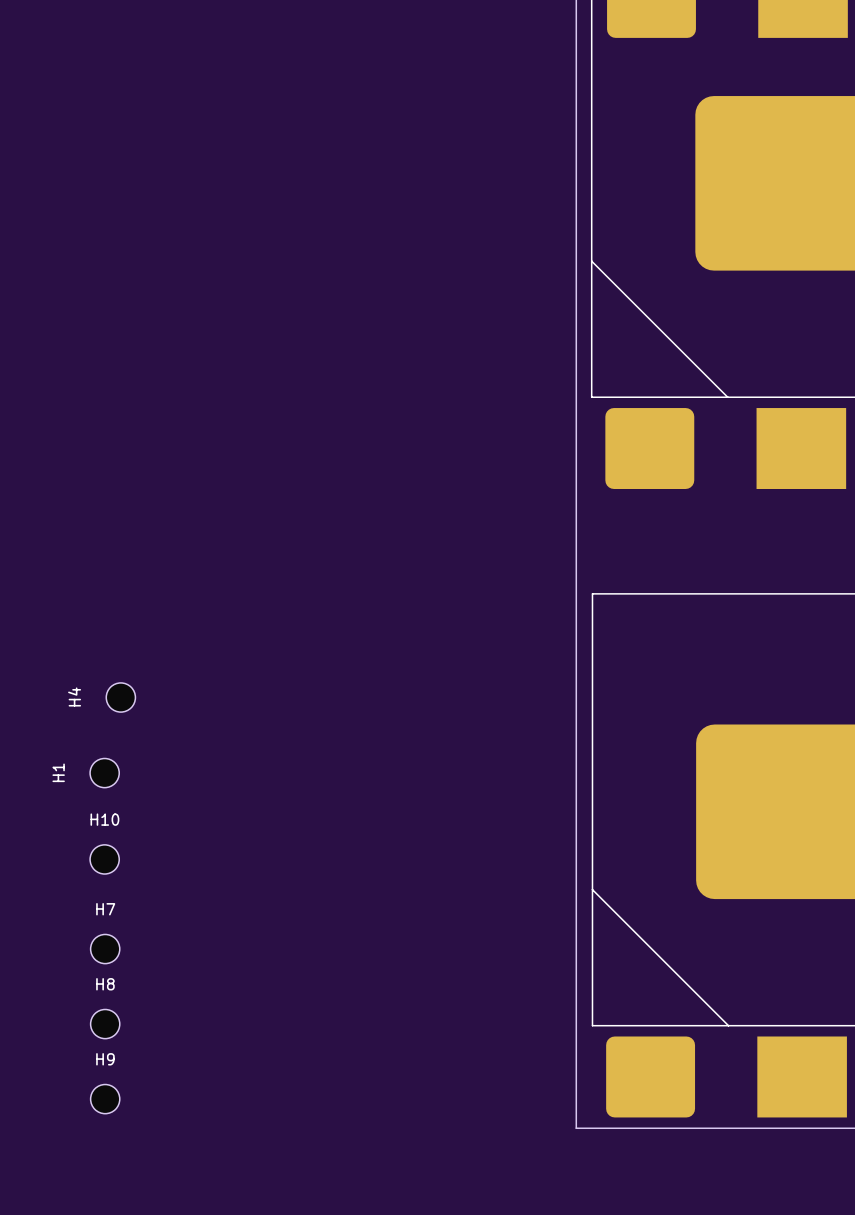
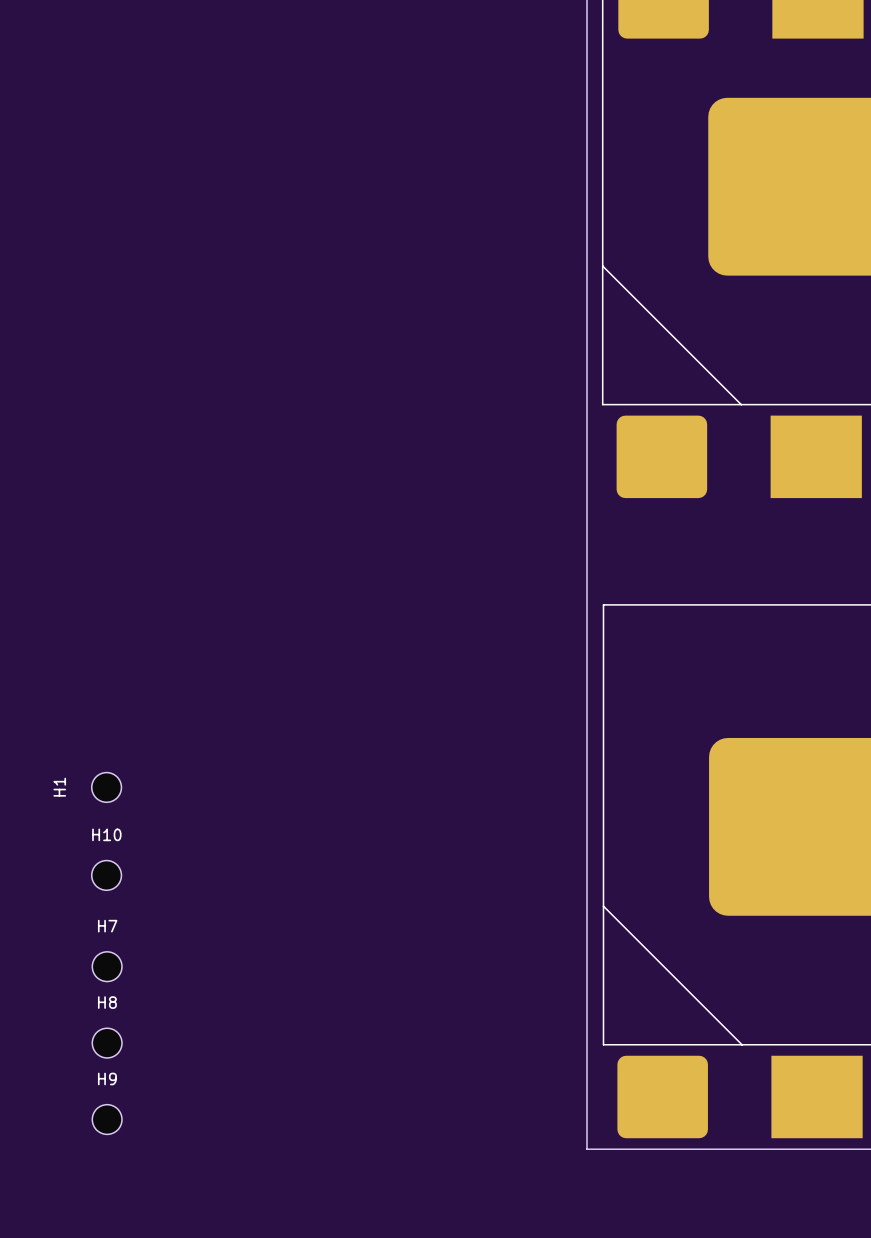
H4: (120, 697) -> none

